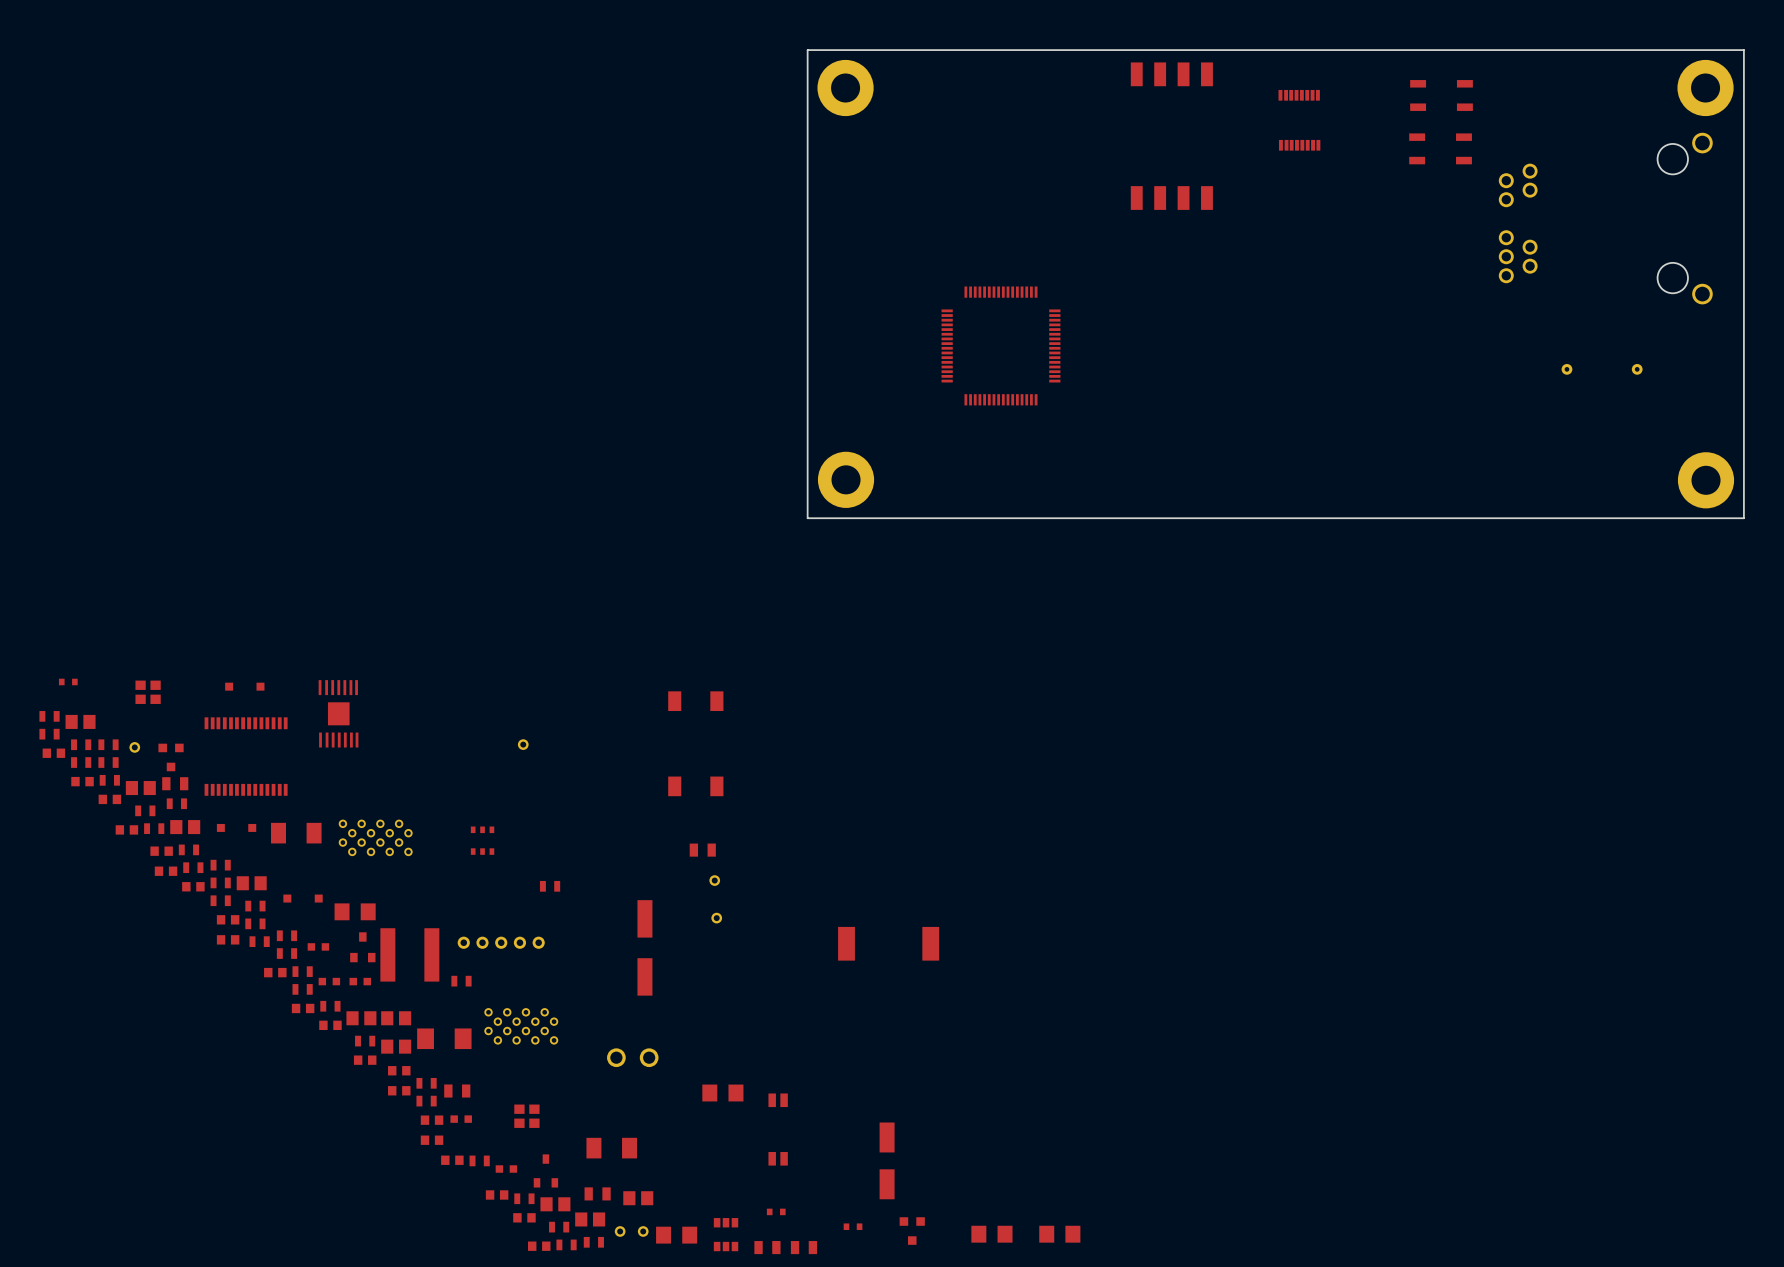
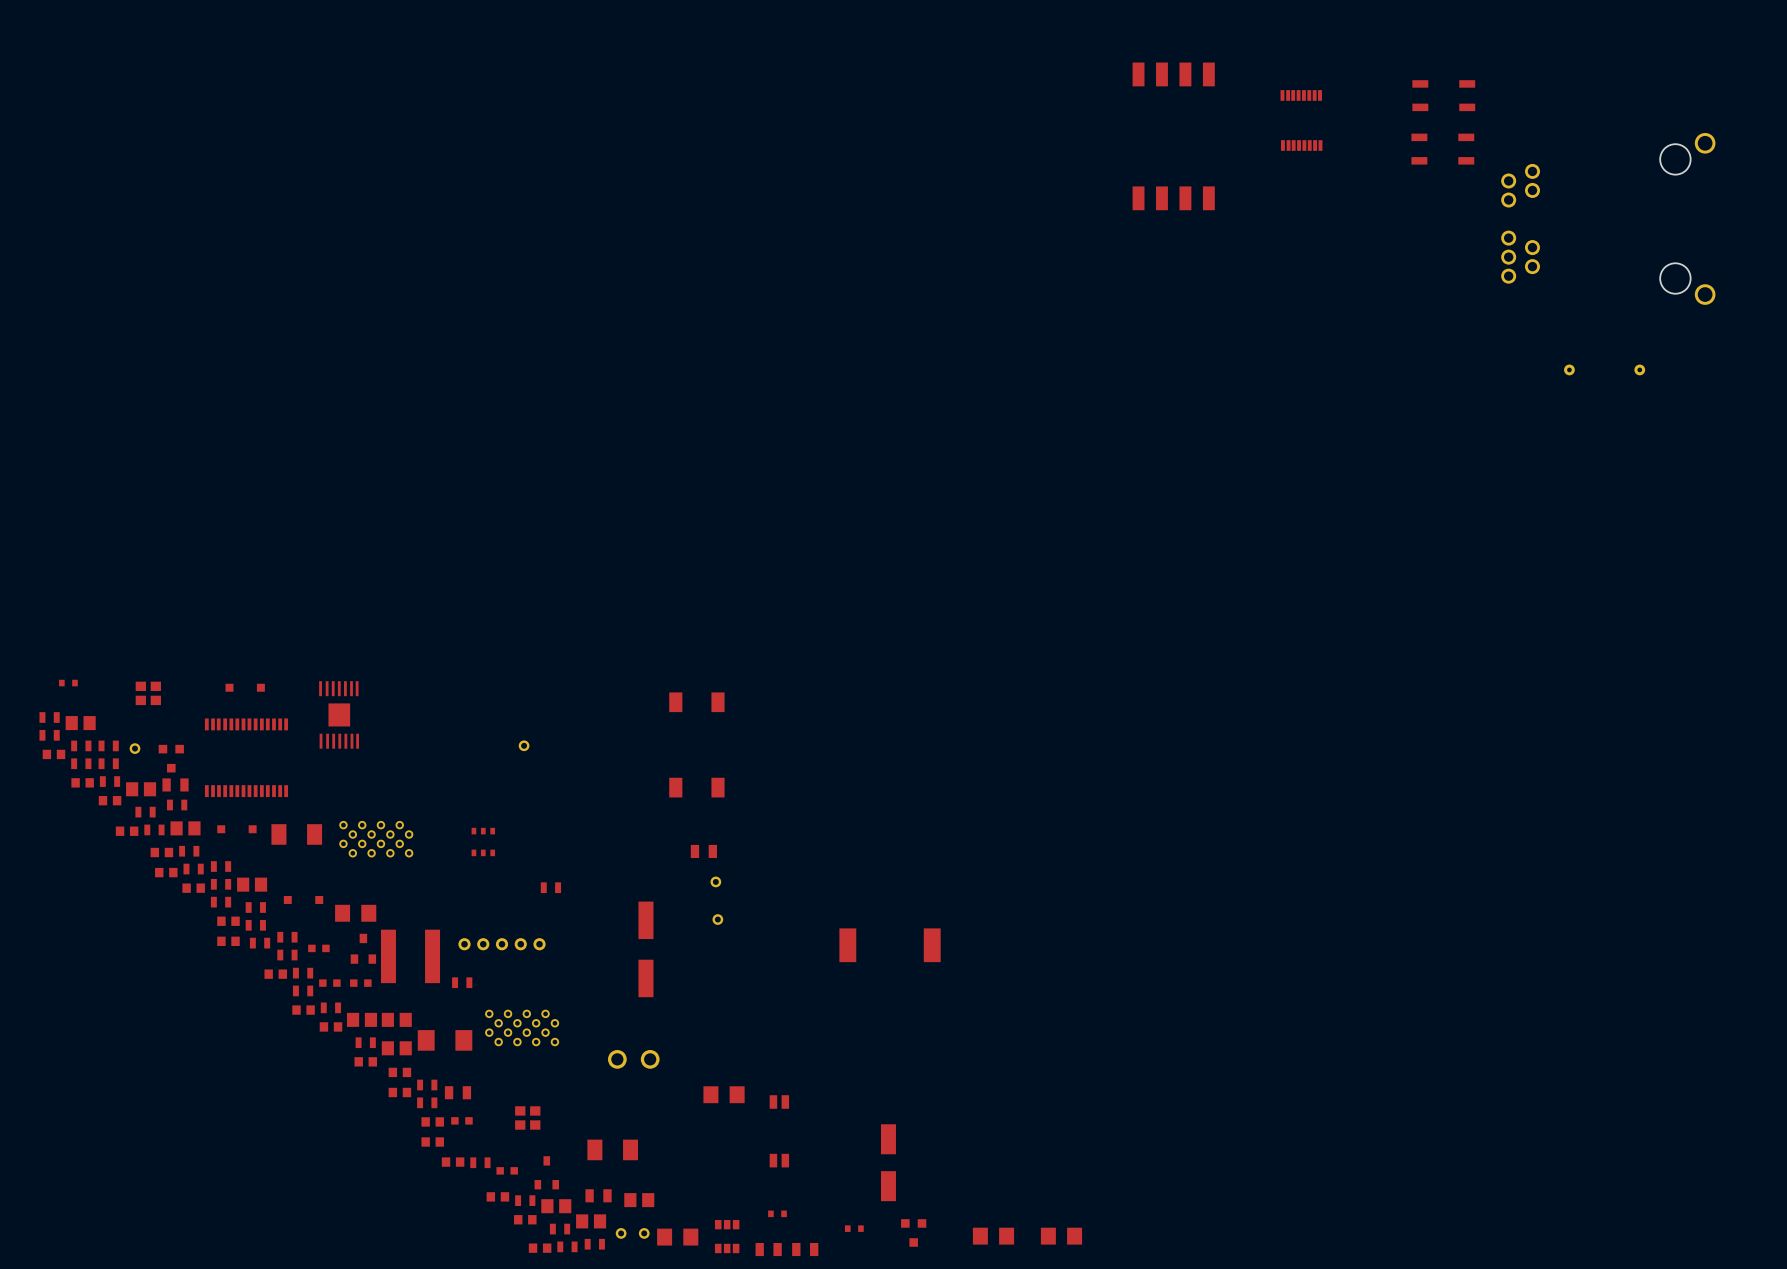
board edge: (1743, 50) (807, 50) (807, 518) (1743, 518) (1743, 50) -> none
part: (845, 88) -> none
part: (1705, 88) -> none
part: (1000, 345) -> none
part: (846, 479) -> none
part: (1706, 480) -> none

